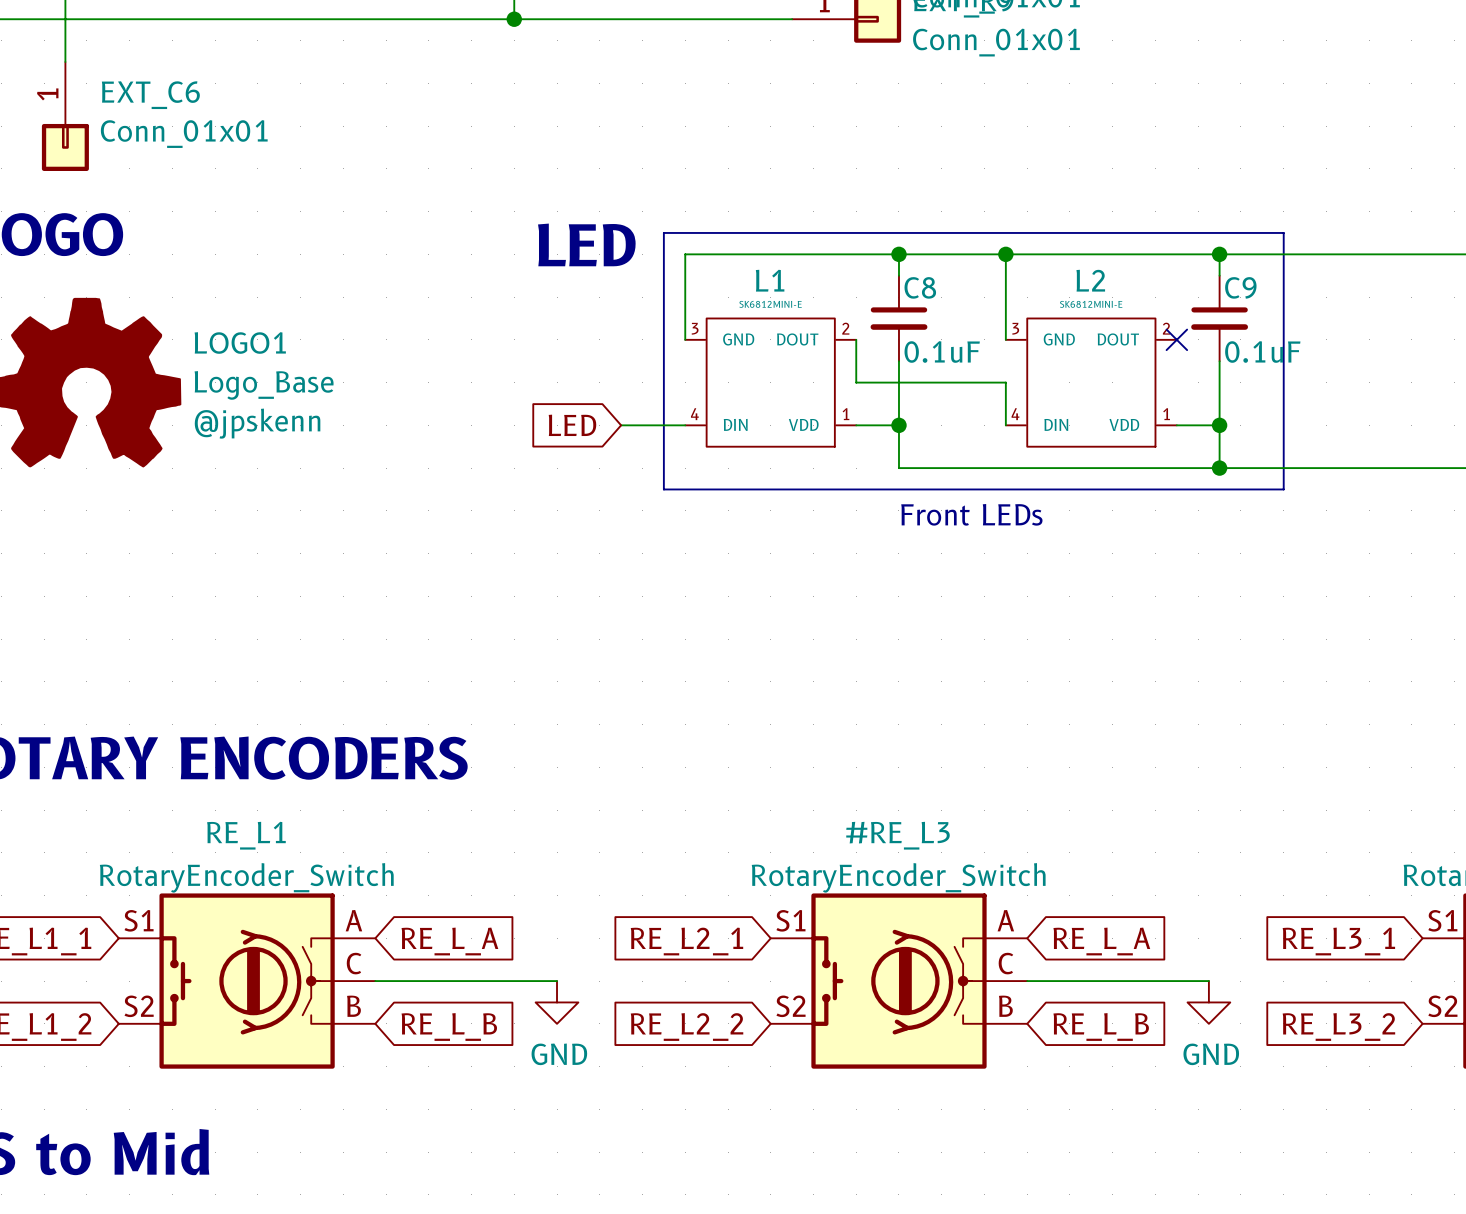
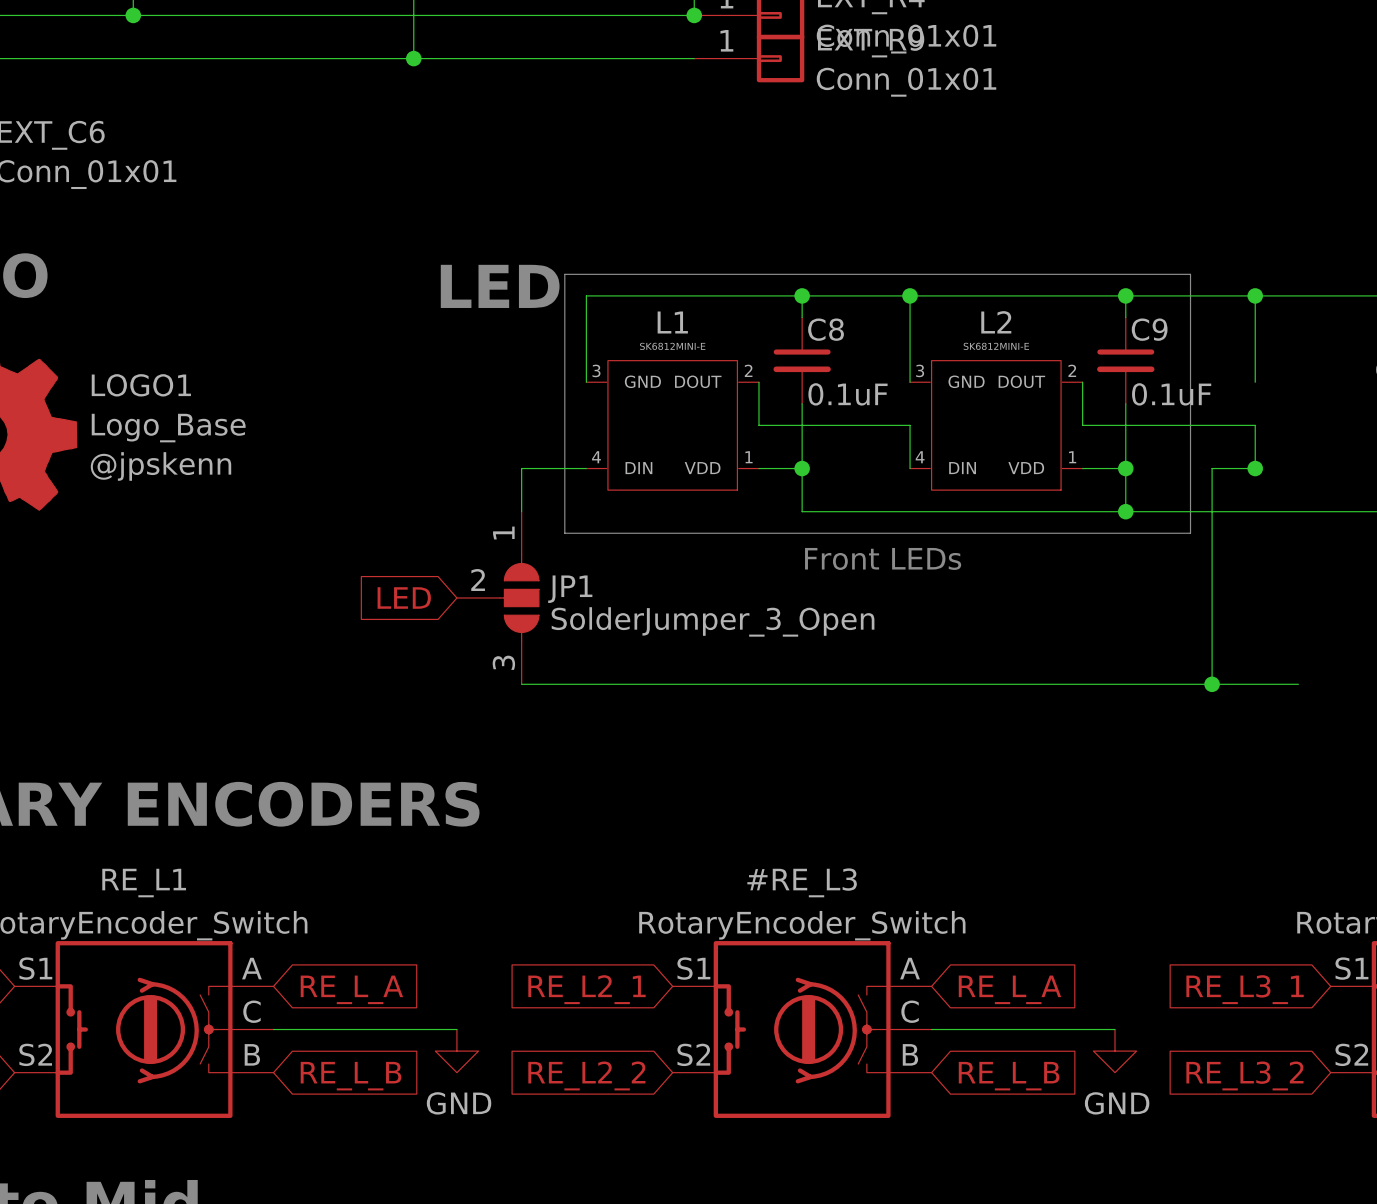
wire: none -> (1255, 295) (1255, 382)
junction: none -> (1255, 295)
wire: none -> (1082, 382) (1082, 425) (1255, 425) (1255, 468) (1212, 468) (1212, 684)
no-connect mark: (1176, 339) -> none
global label position: LED (572, 425) -> LED (404, 597)
wire: none -> (521, 468) (521, 511)
junction: none -> (1255, 468)
JP1: none -> SolderJumper_3_Open (497, 597)
wire: none -> (521, 684) (1298, 684)
junction: none -> (1212, 684)

